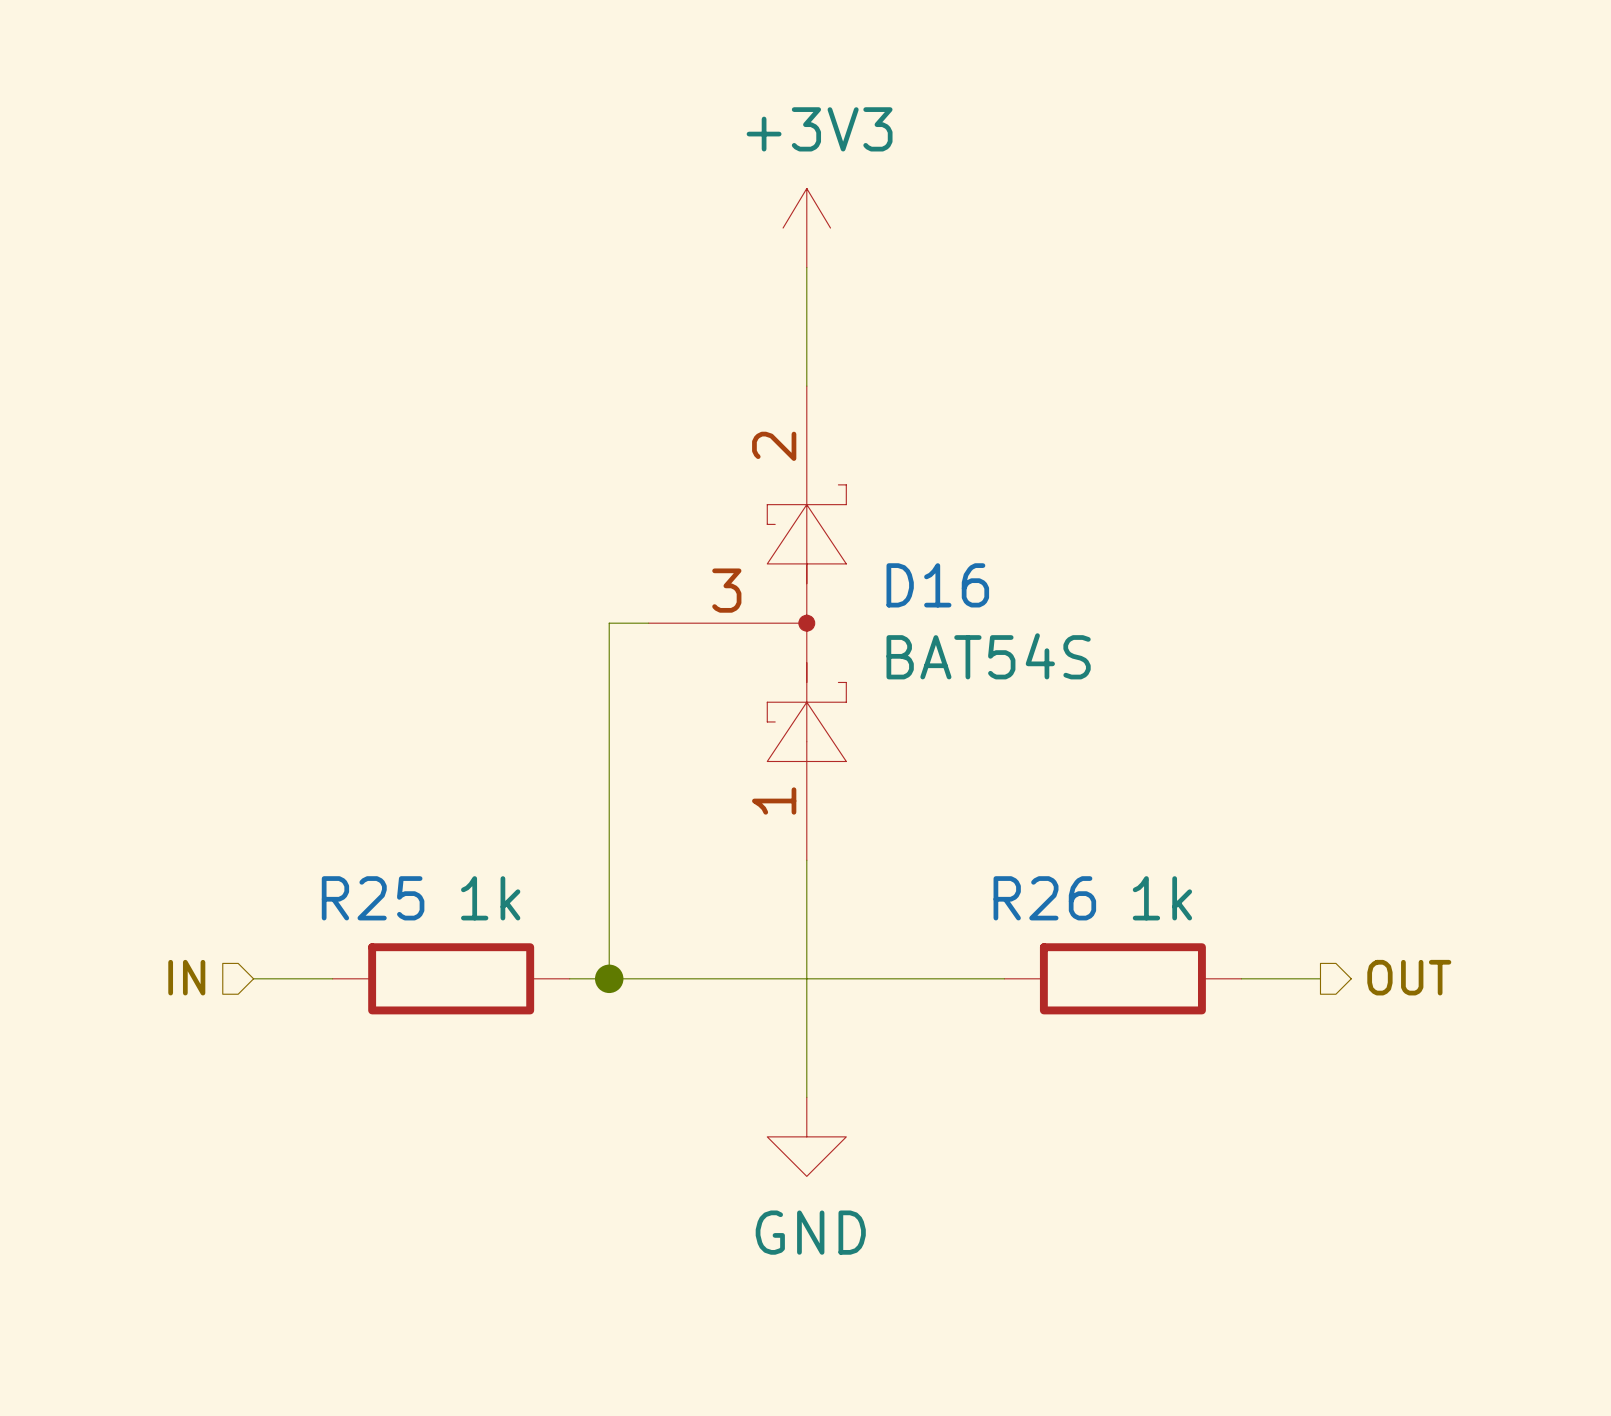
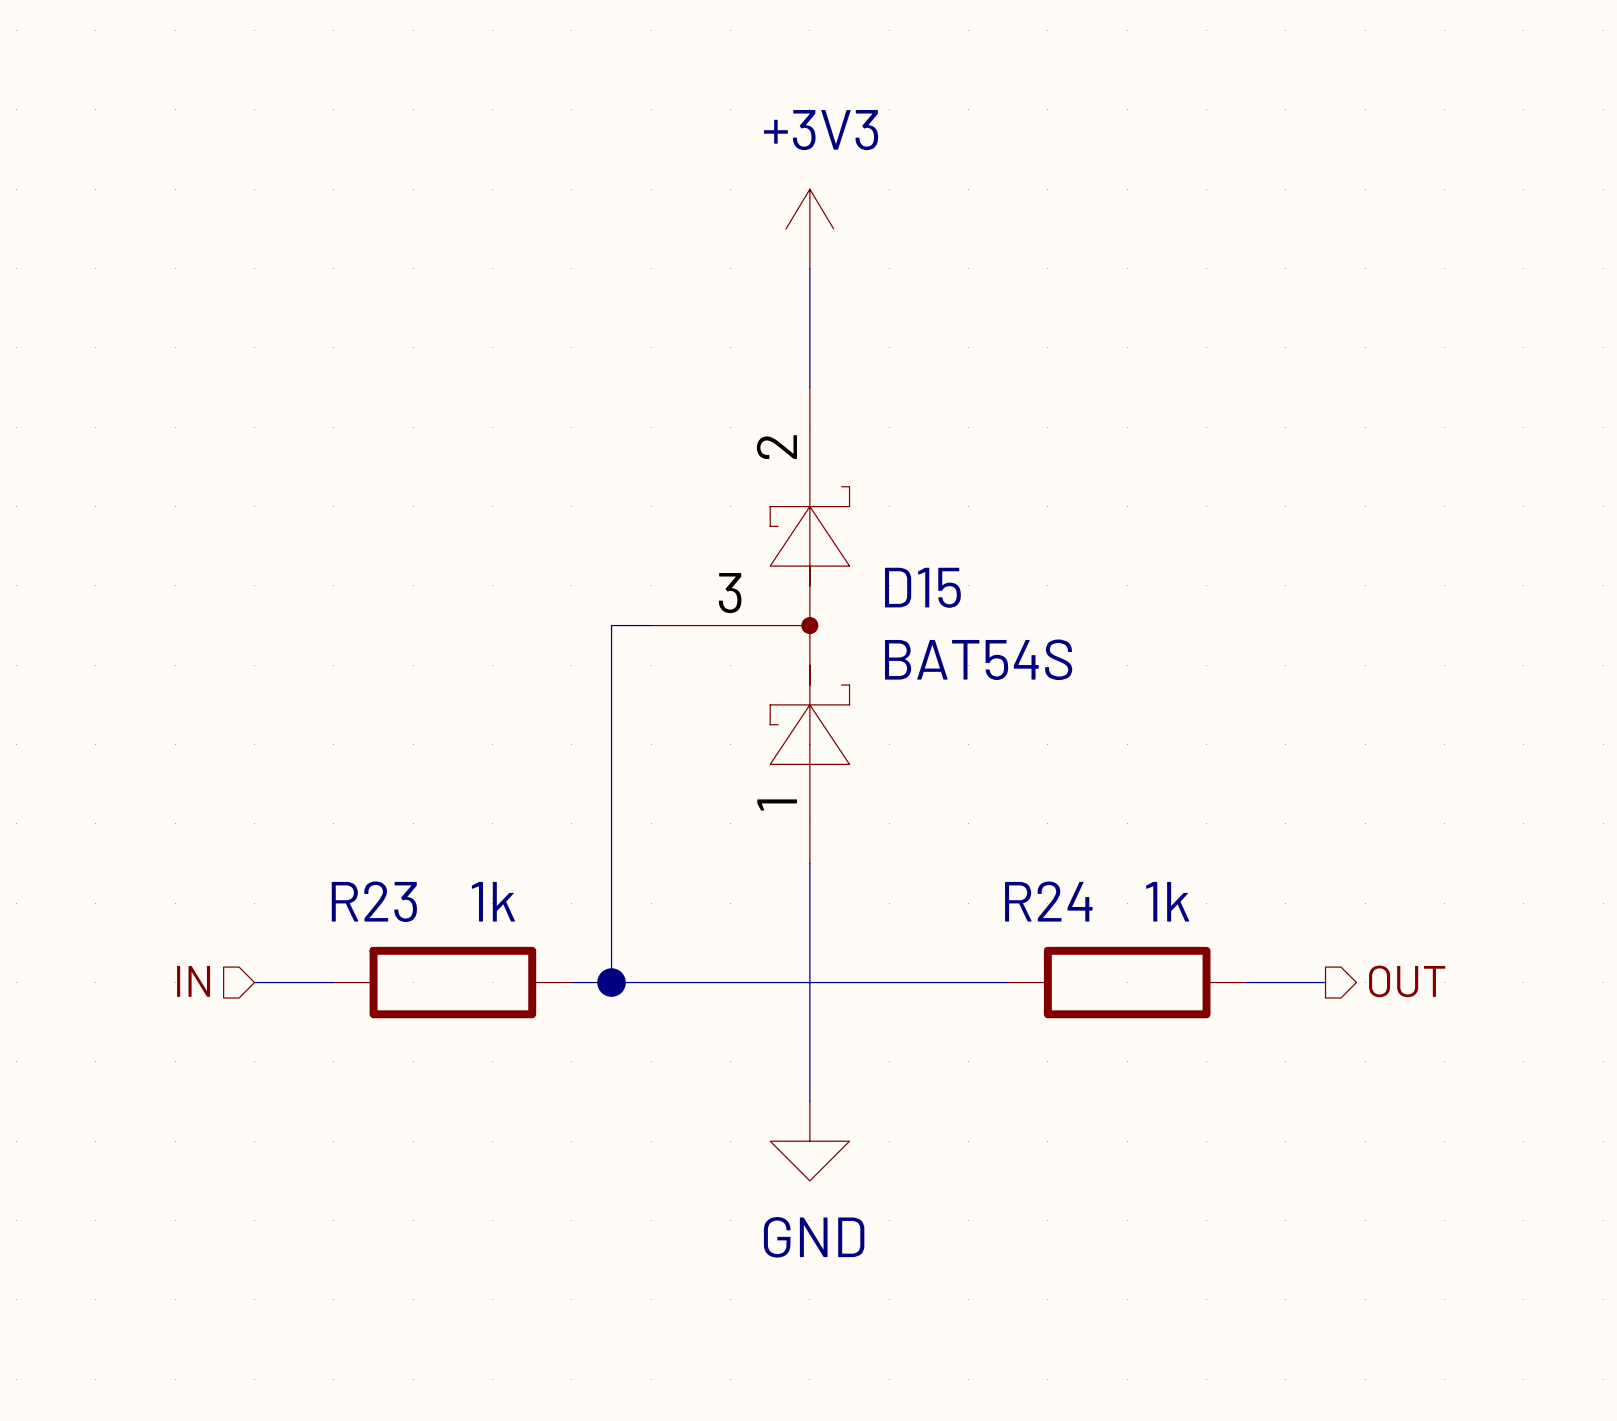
D16 name: D16 (937, 585) -> D15 (922, 587)
R25 name: R25 (373, 898) -> R23 (374, 901)
R26 name: R26 (1044, 898) -> R24 (1048, 901)

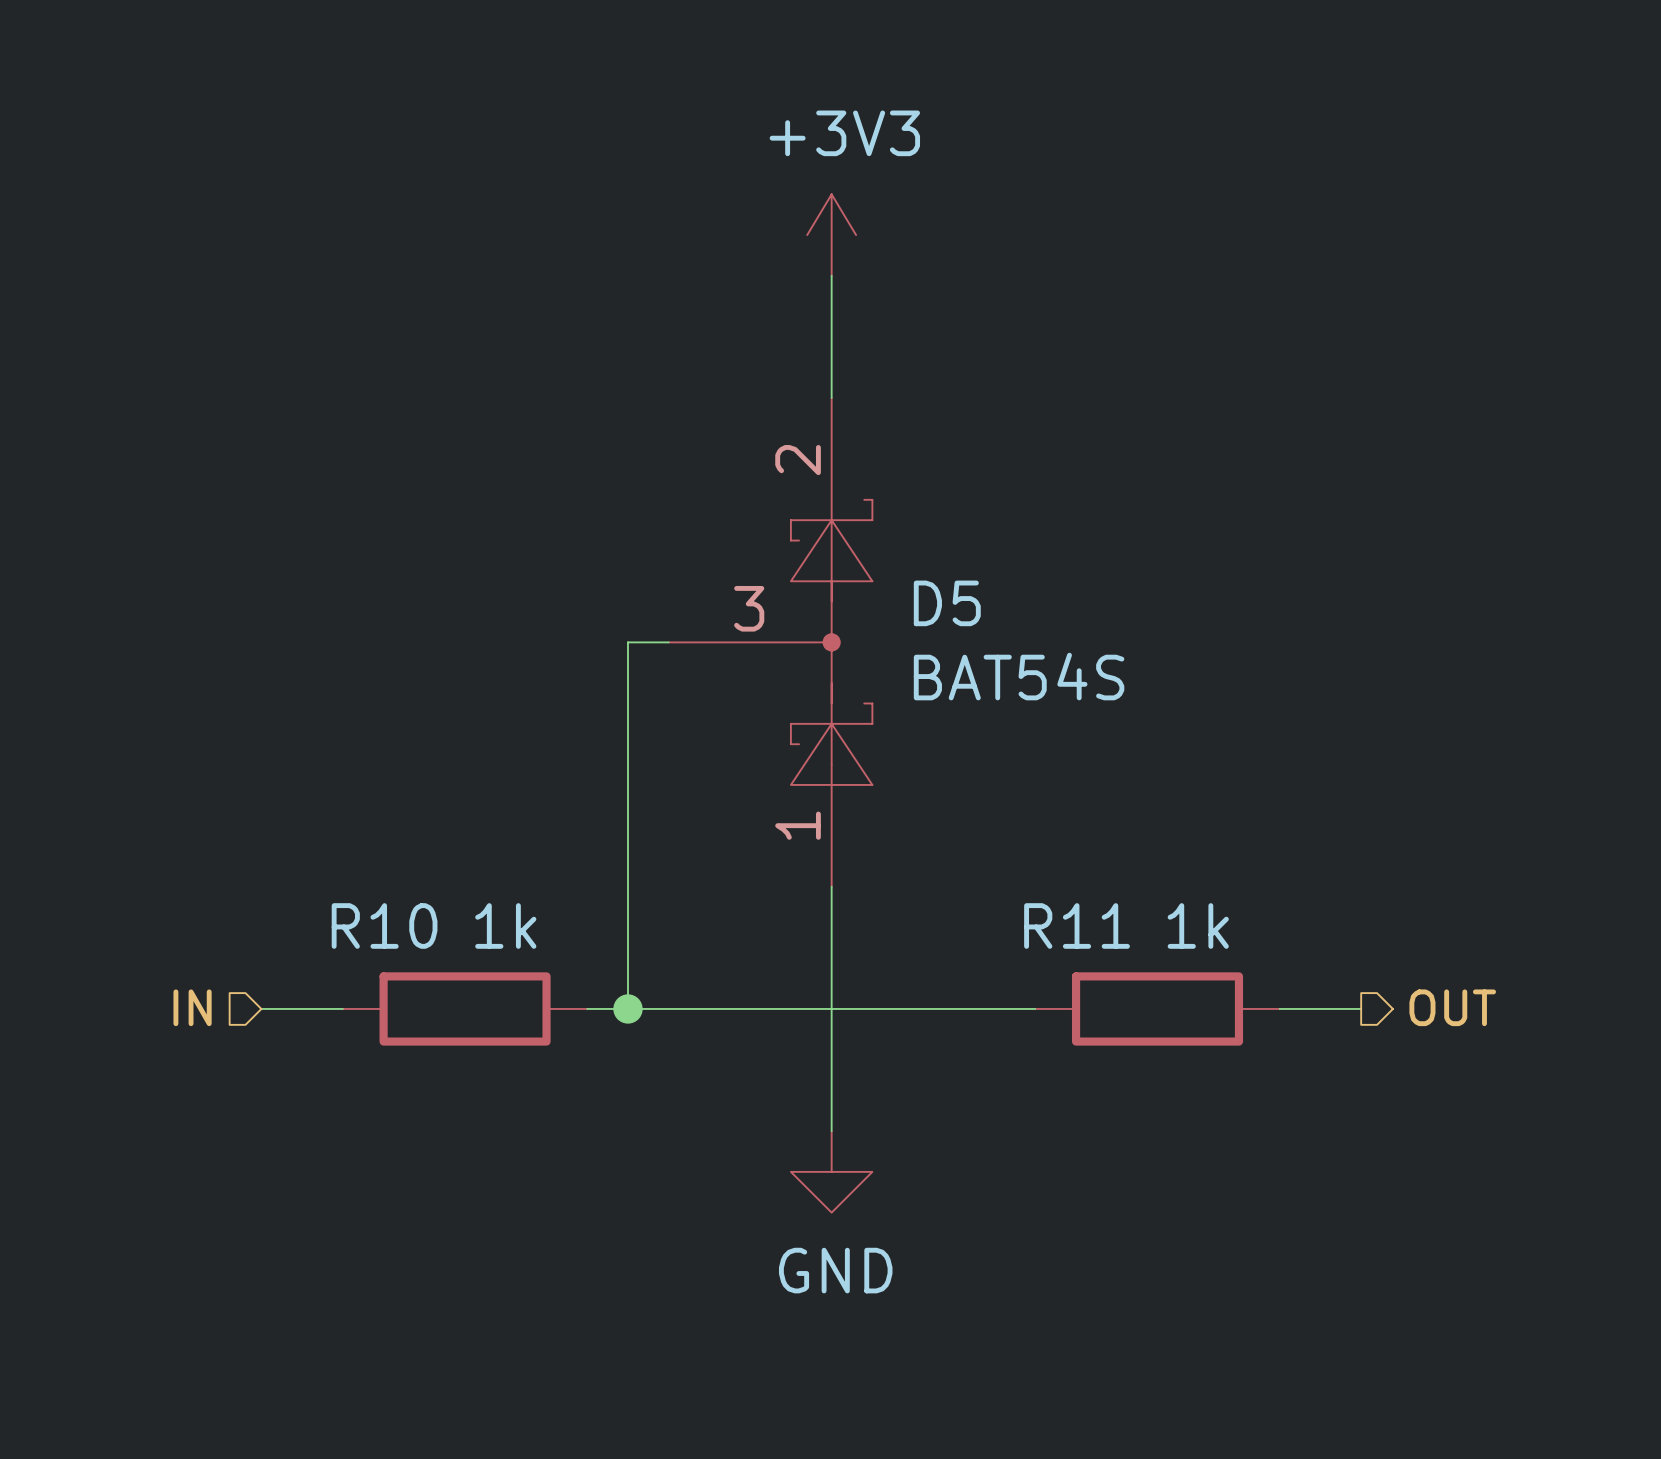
D15 name: D15 (922, 587) -> D5 (947, 603)
R23 name: R23 (374, 901) -> R10 (384, 925)
R24 name: R24 (1048, 901) -> R11 (1077, 925)

